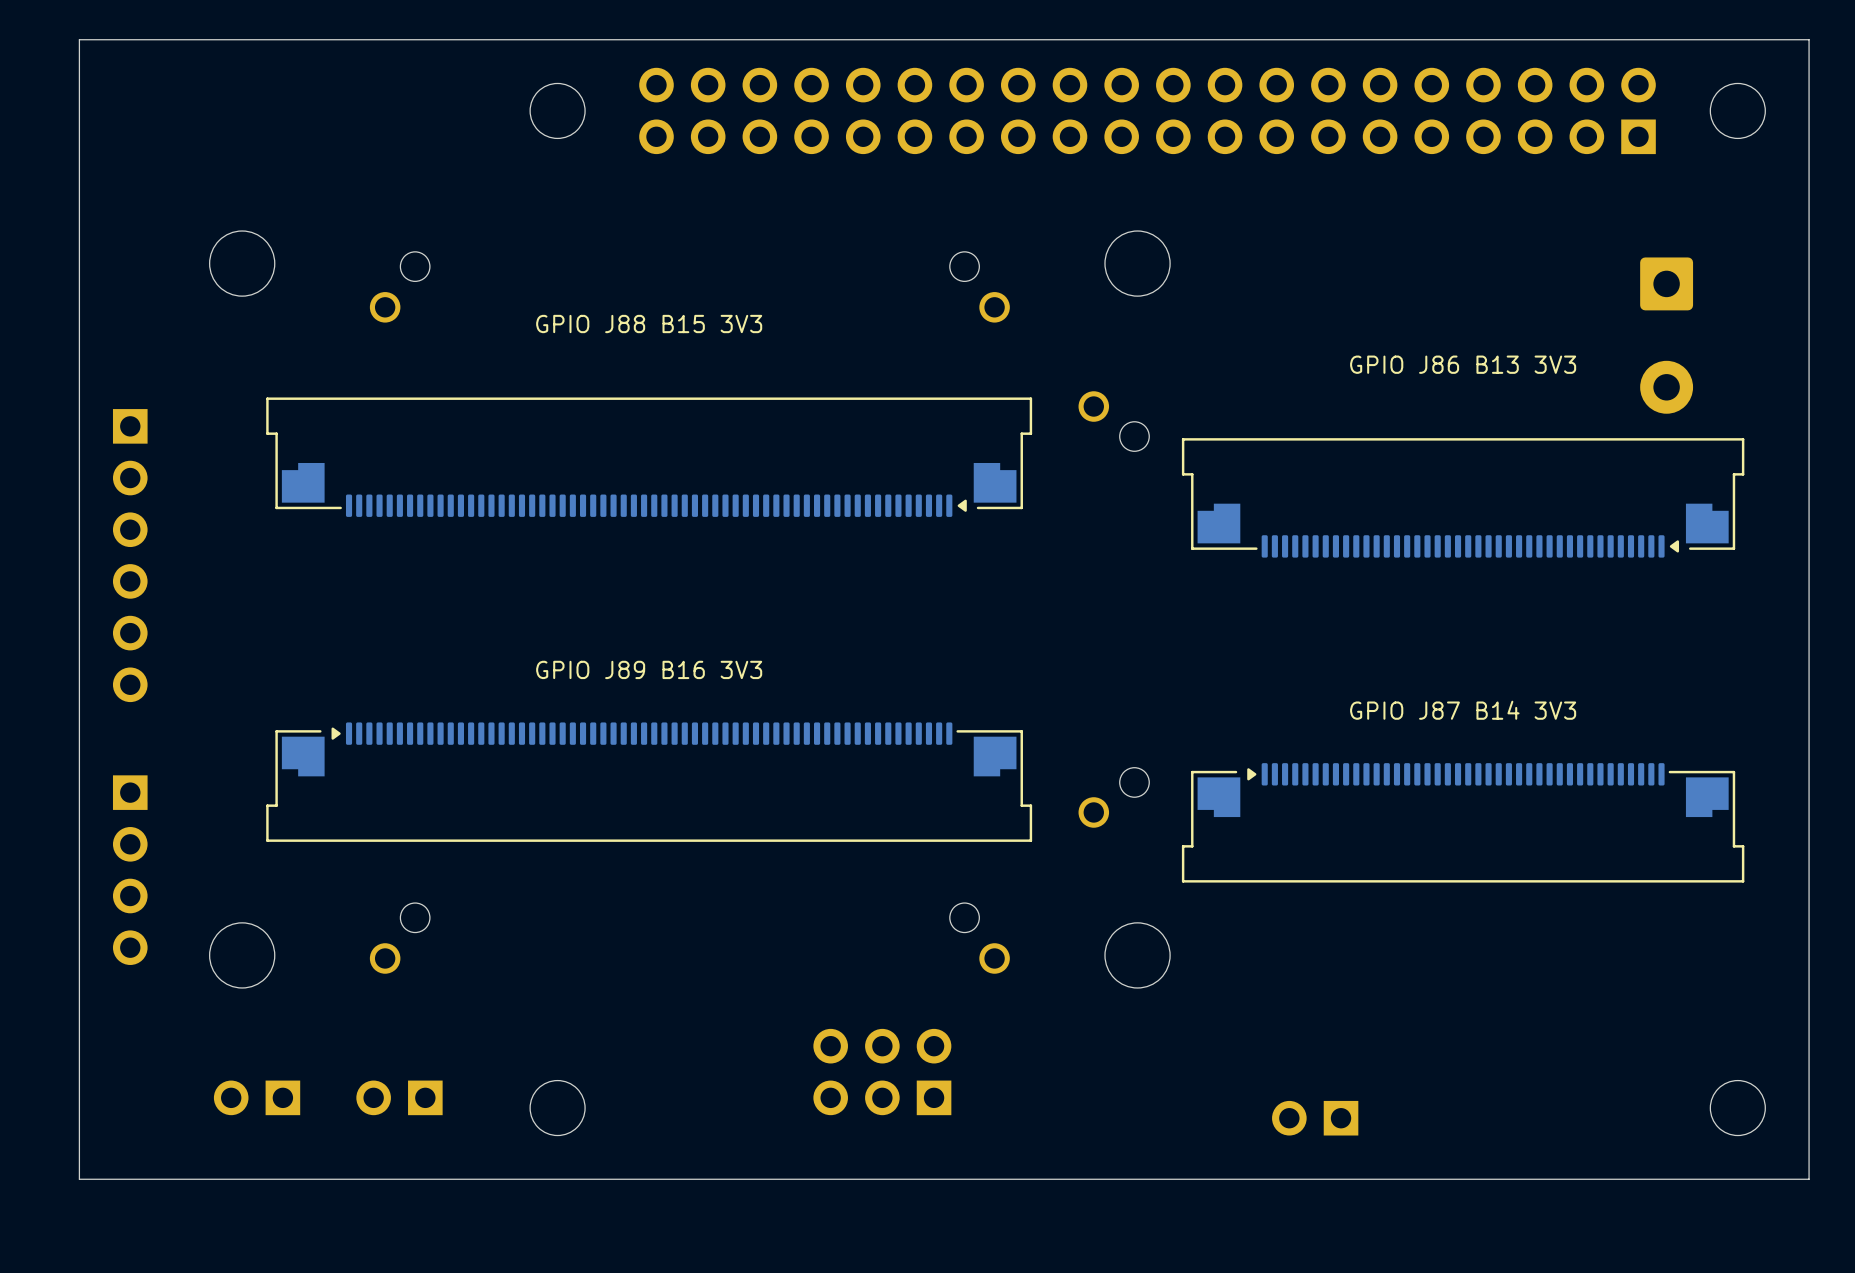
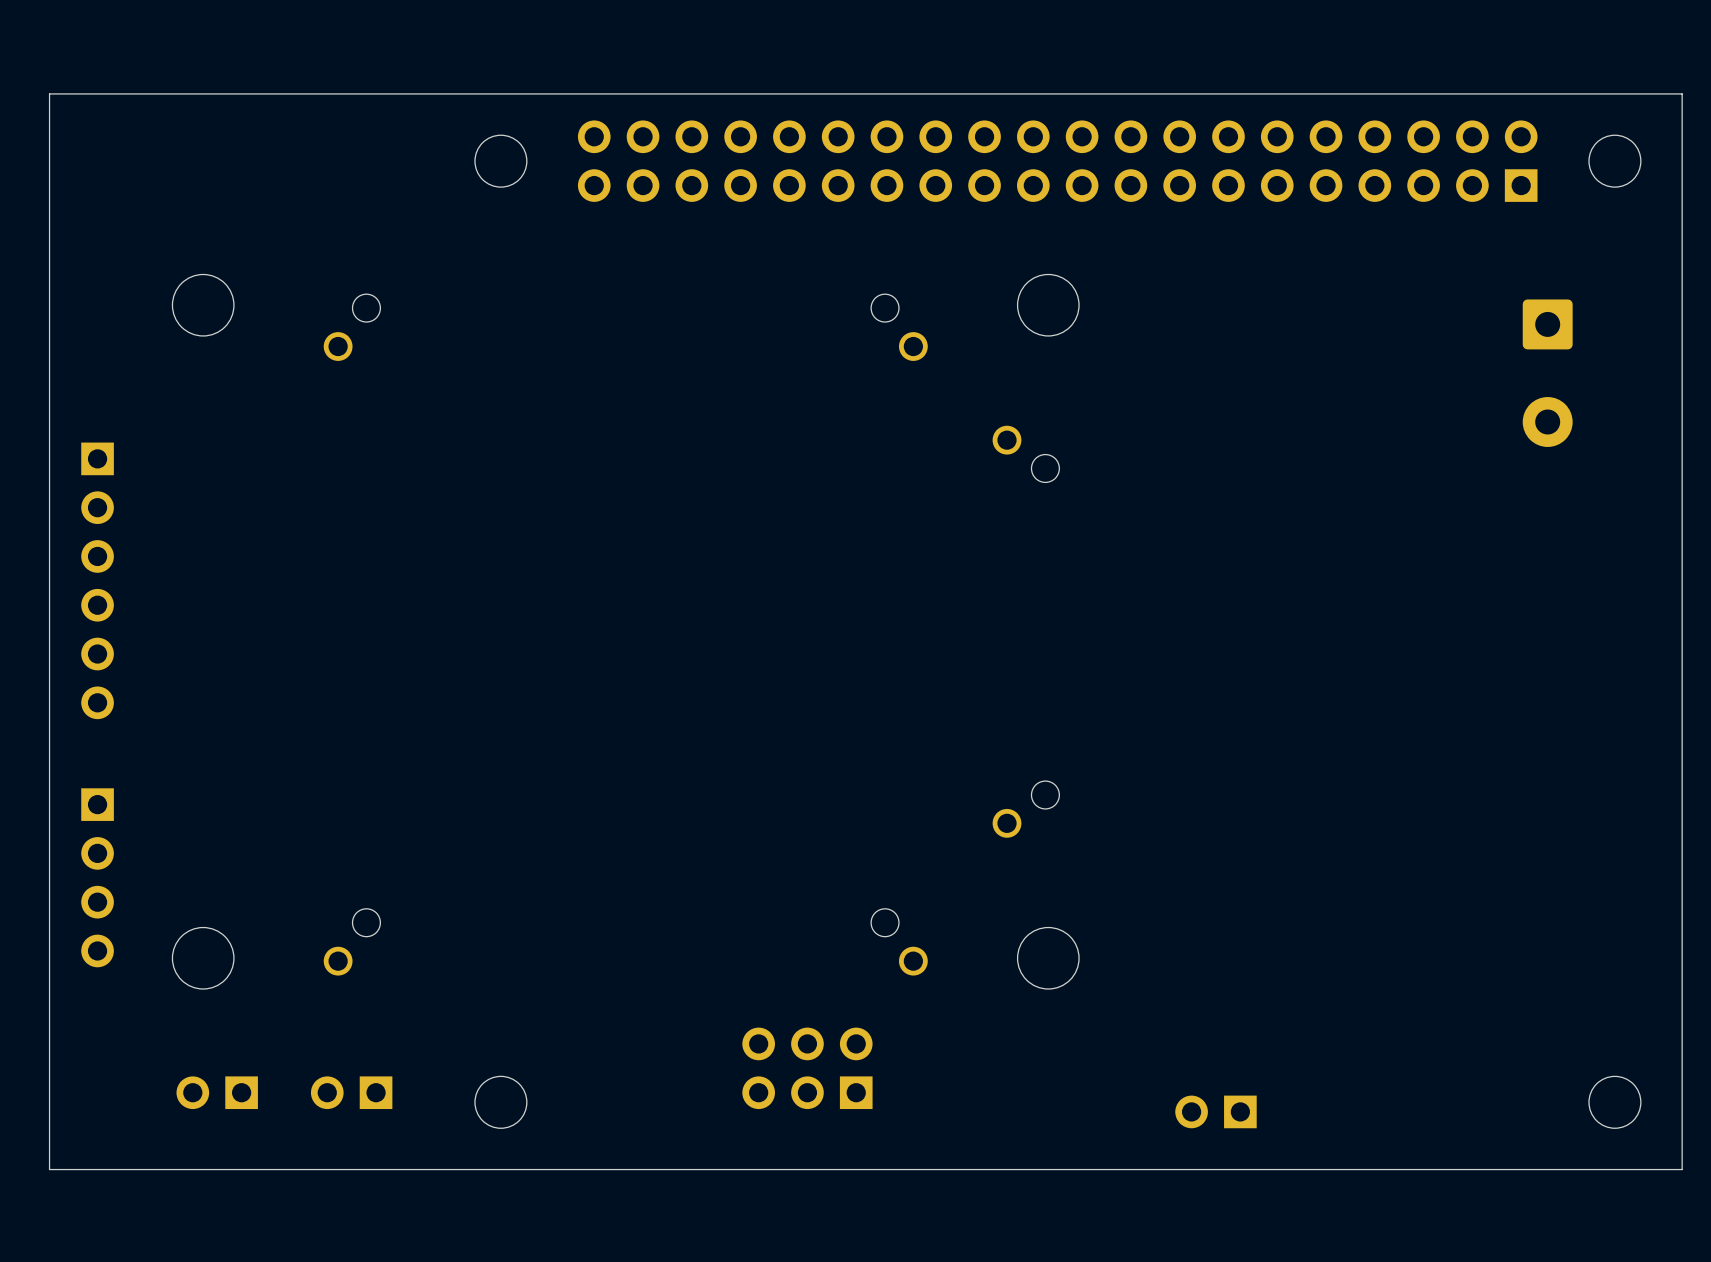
text: GPIO J88 B15 3V3 (649, 324) -> none
text: GPIO J86 B13 3V3 (1463, 364) -> none
part: (649, 457) -> none
part: (1463, 497) -> none
text: GPIO J89 B16 3V3 (649, 669) -> none
text: GPIO J87 B14 3V3 (1463, 710) -> none
part: (649, 782) -> none
part: (1463, 822) -> none

